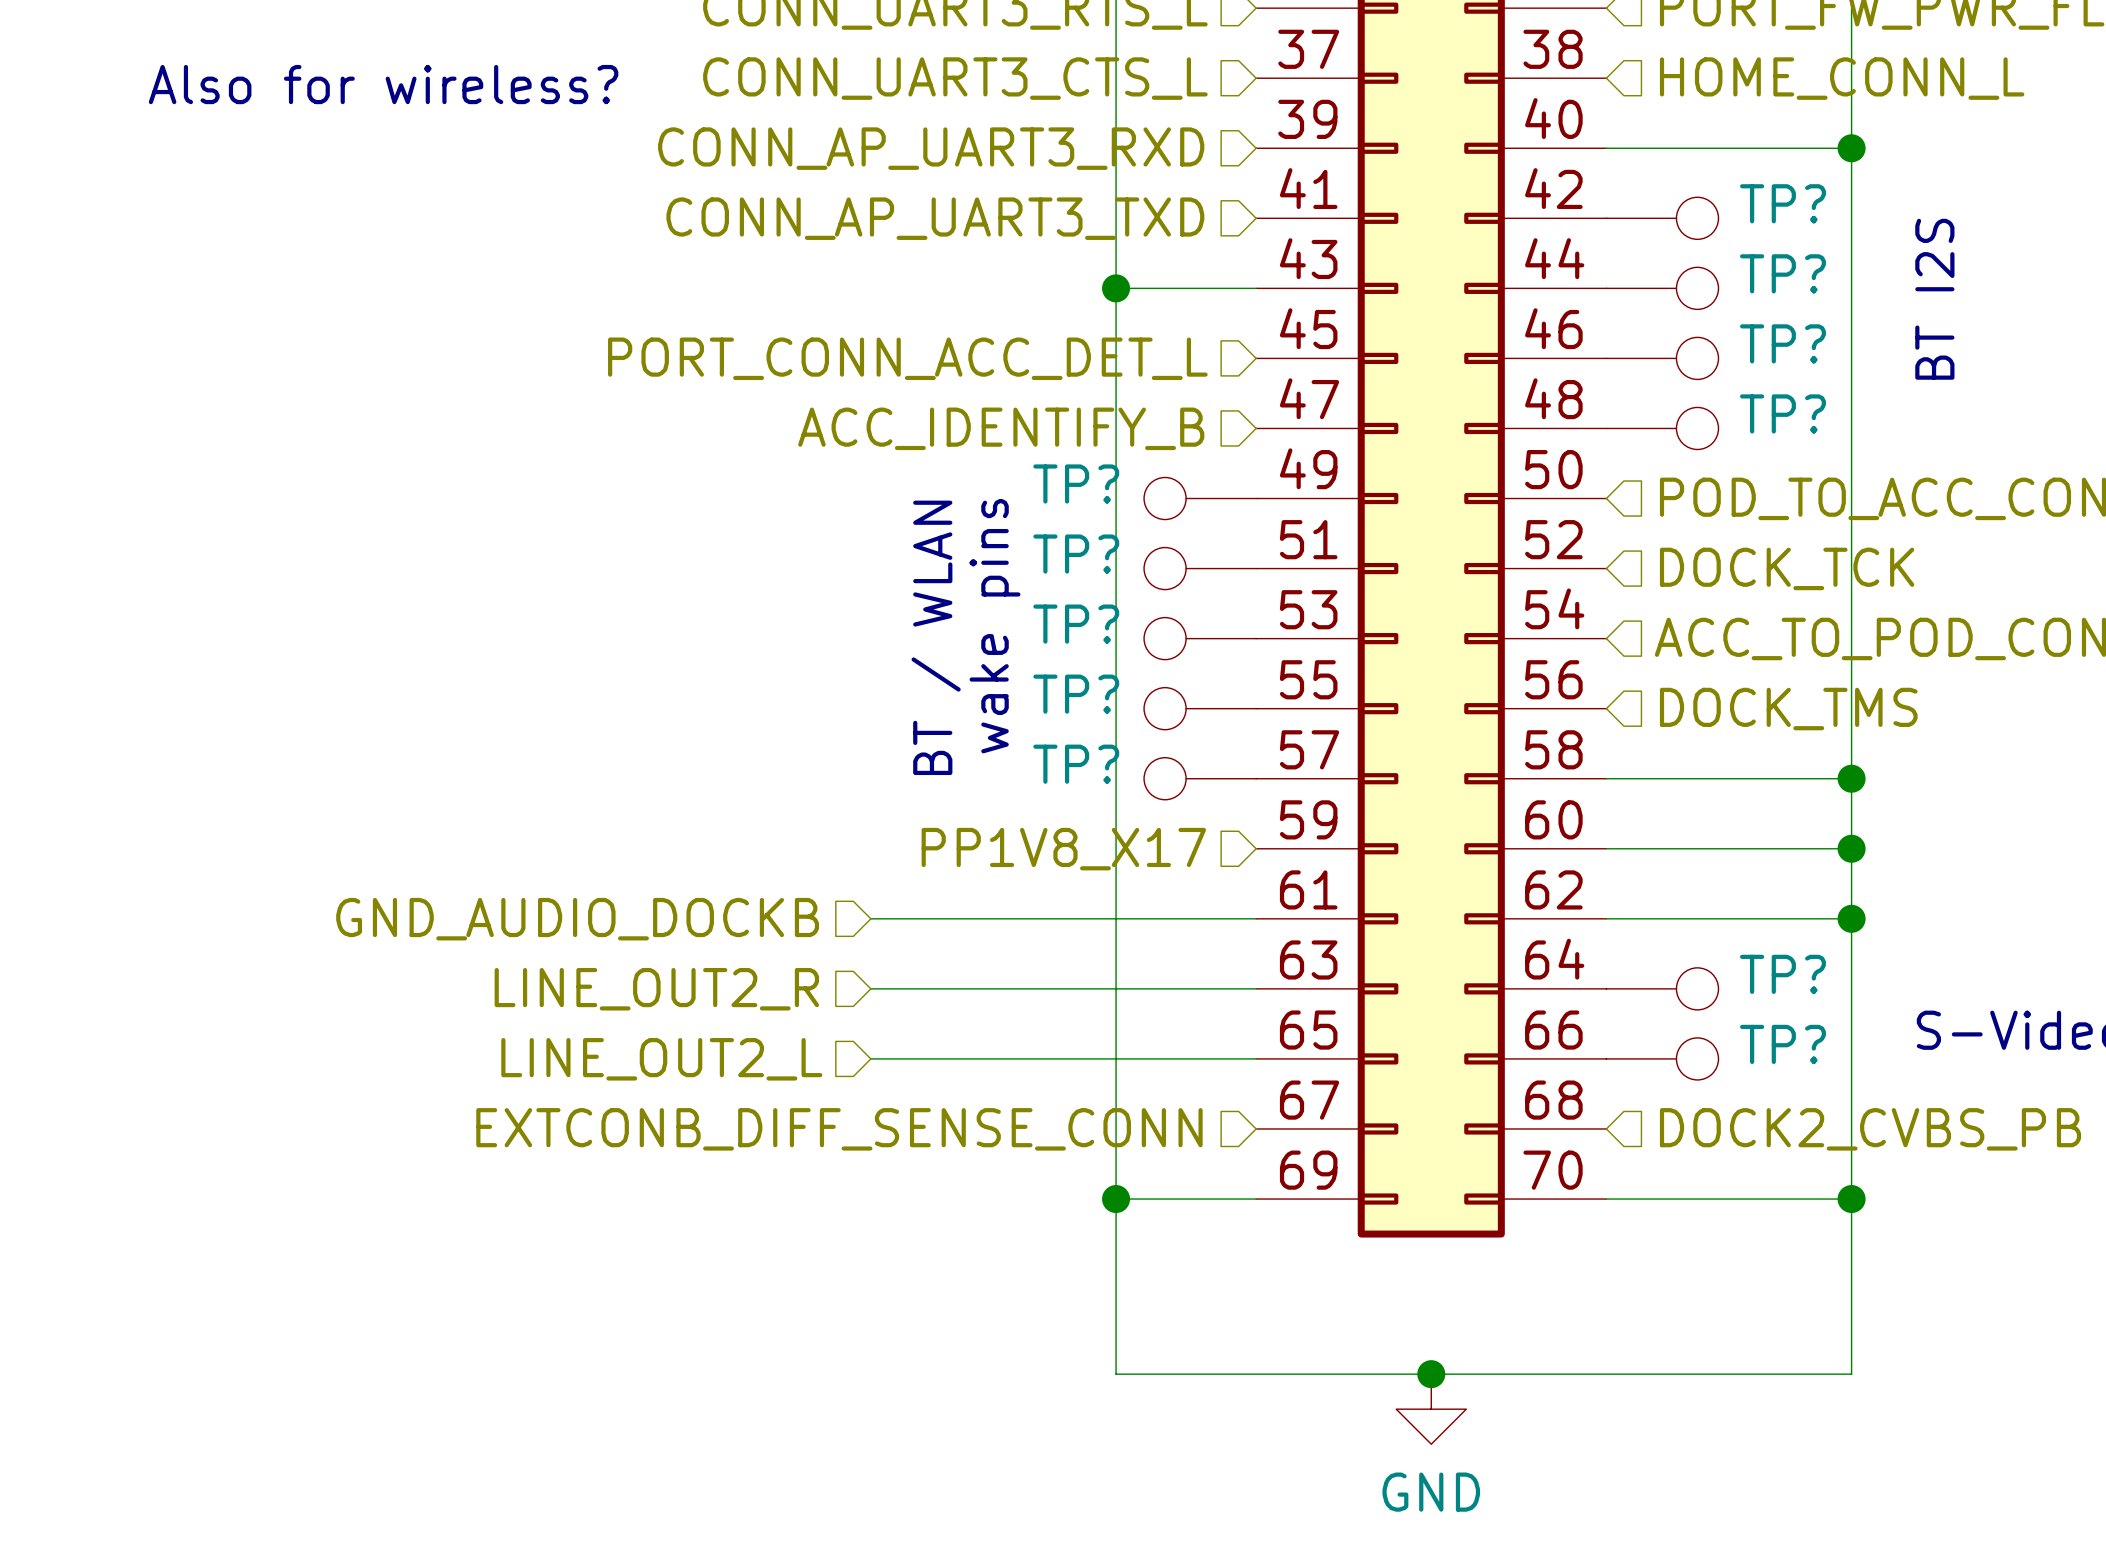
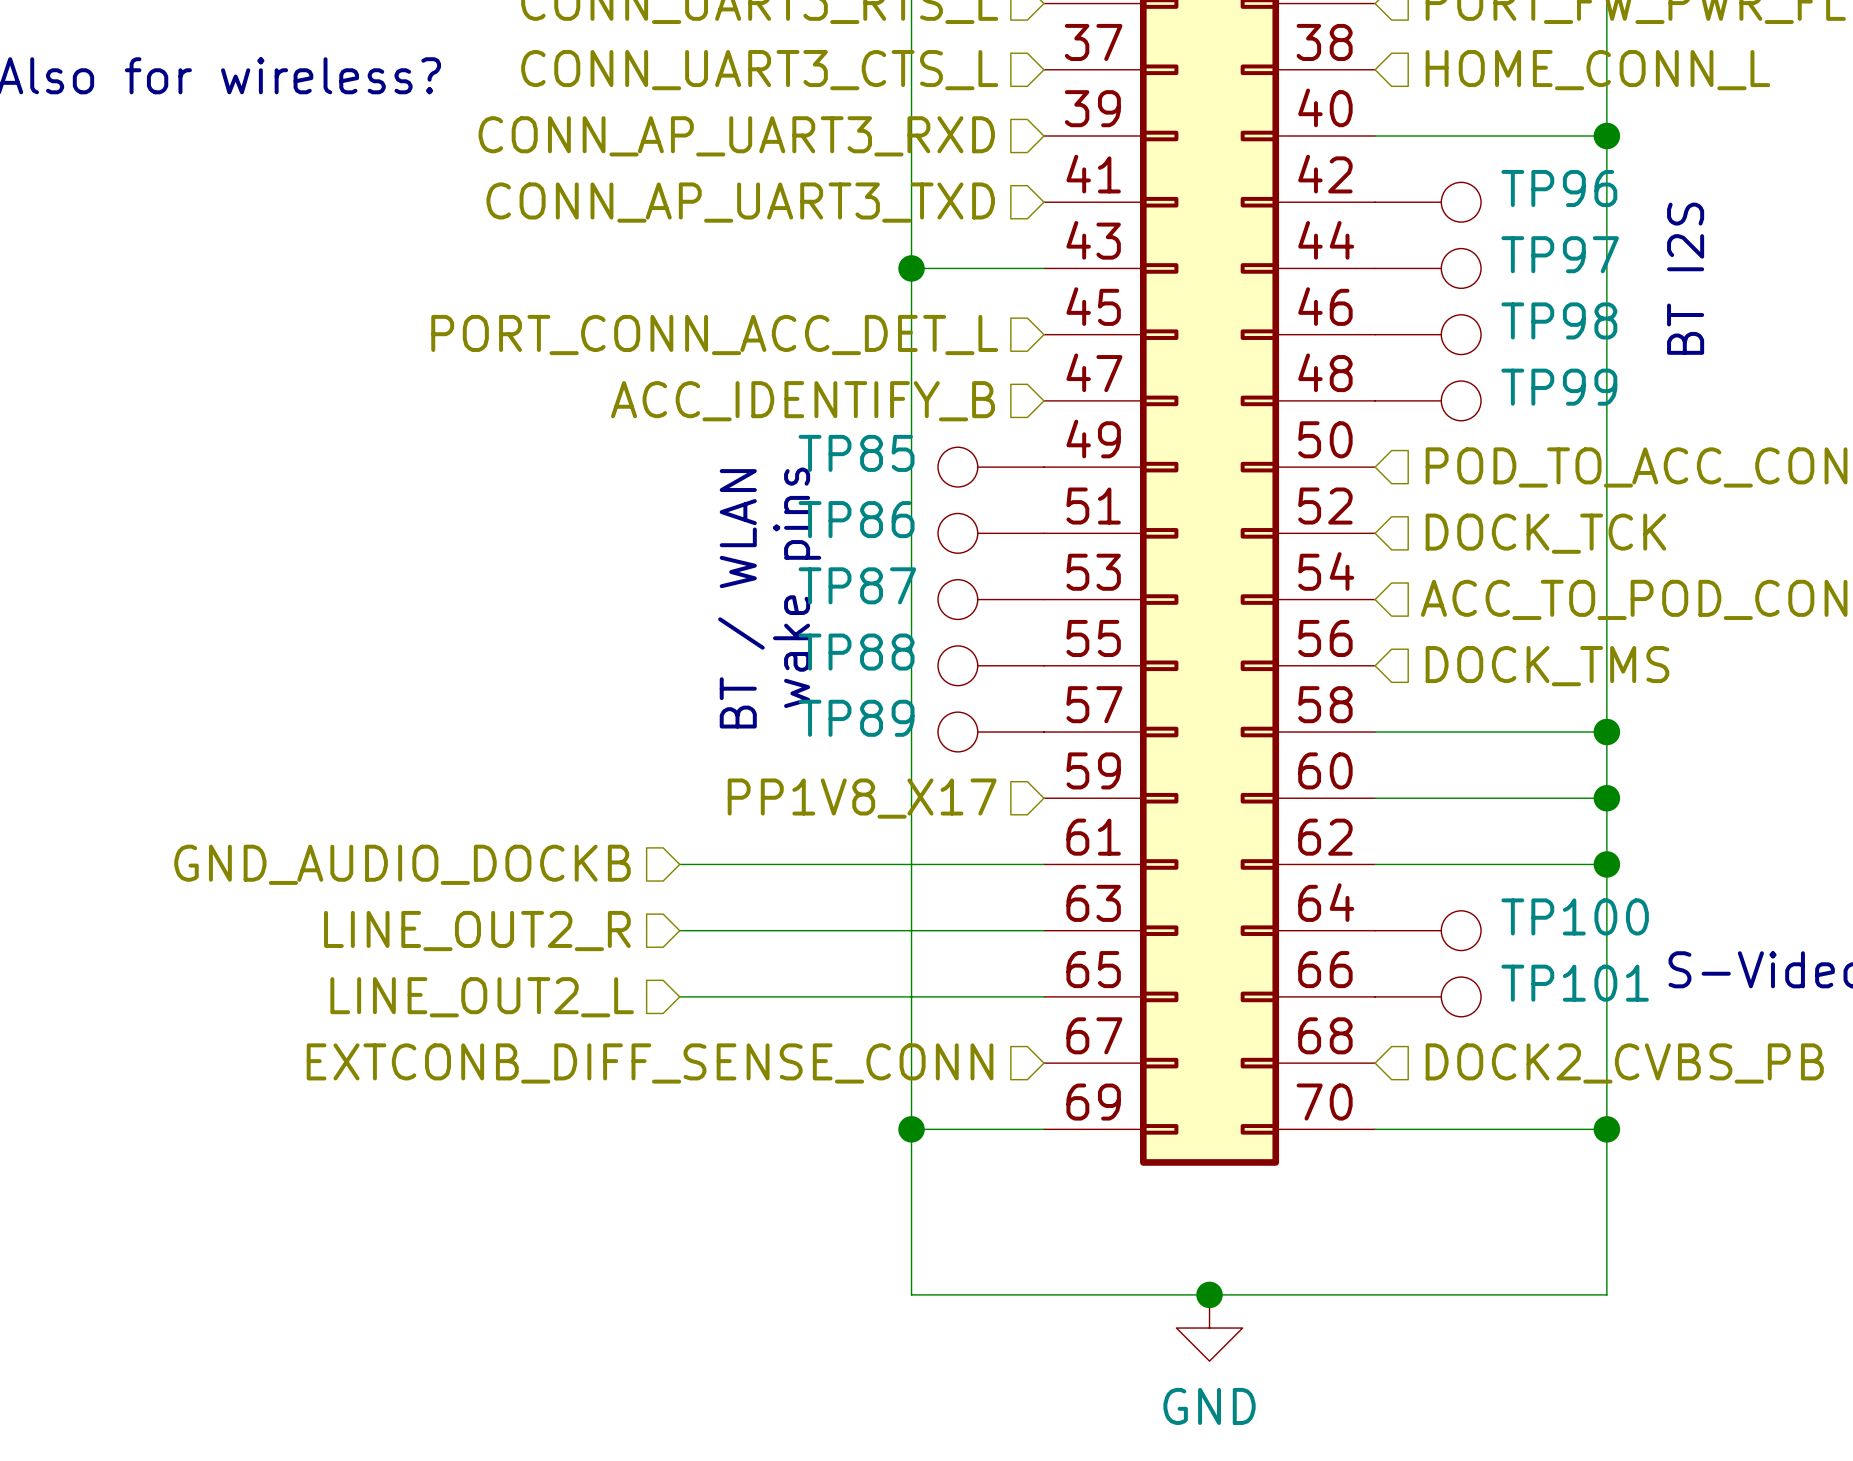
TP? name: TP? (1782, 203) -> TP96 (1559, 188)
TP? name: TP? (1782, 273) -> TP97 (1560, 254)
TP? name: TP? (1782, 343) -> TP98 (1559, 320)
TP? name: TP? (1782, 413) -> TP99 (1559, 387)
TP? name: TP? (1076, 484) -> TP85 (856, 453)
TP? name: TP? (1076, 554) -> TP86 (856, 519)
TP? name: TP? (1076, 624) -> TP87 (857, 585)
TP? name: TP? (1076, 694) -> TP88 (856, 652)
TP? name: TP? (1076, 764) -> TP89 (856, 718)
TP? name: TP? (1782, 974) -> TP100 (1575, 916)
TP? name: TP? (1782, 1044) -> TP101 (1575, 983)

